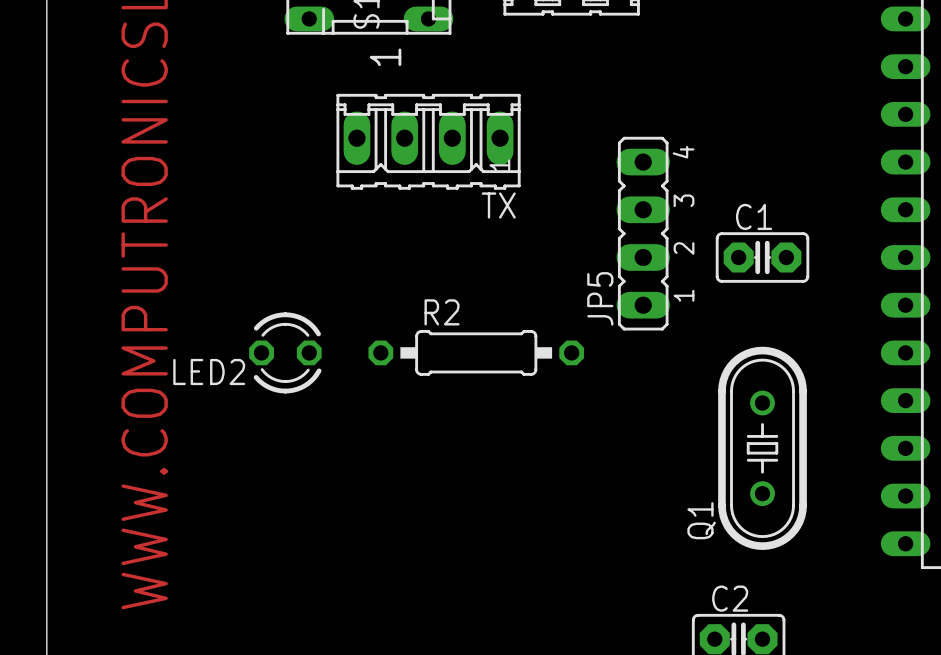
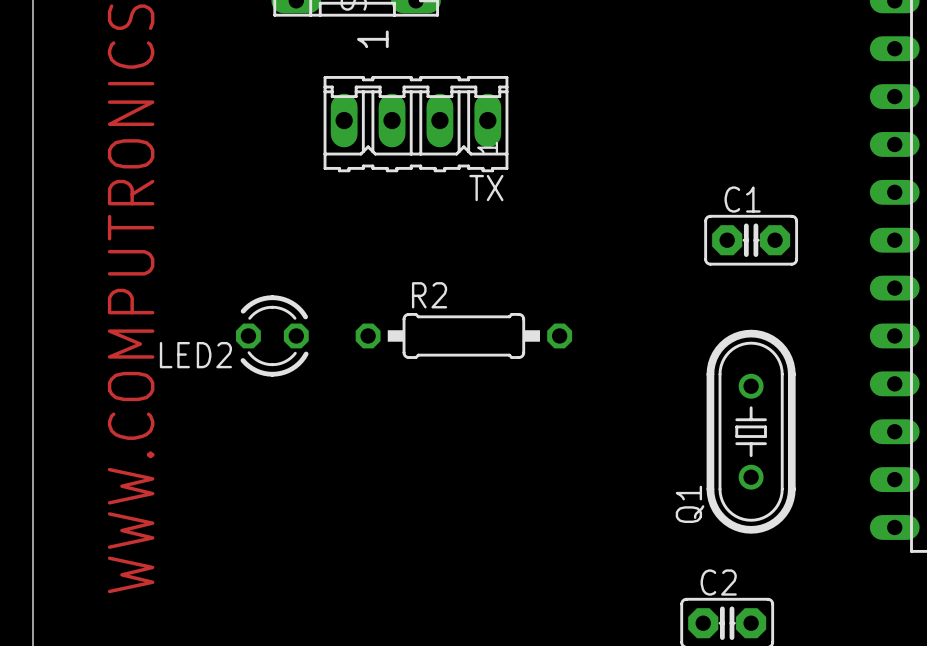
JP5: (643, 233) -> none

